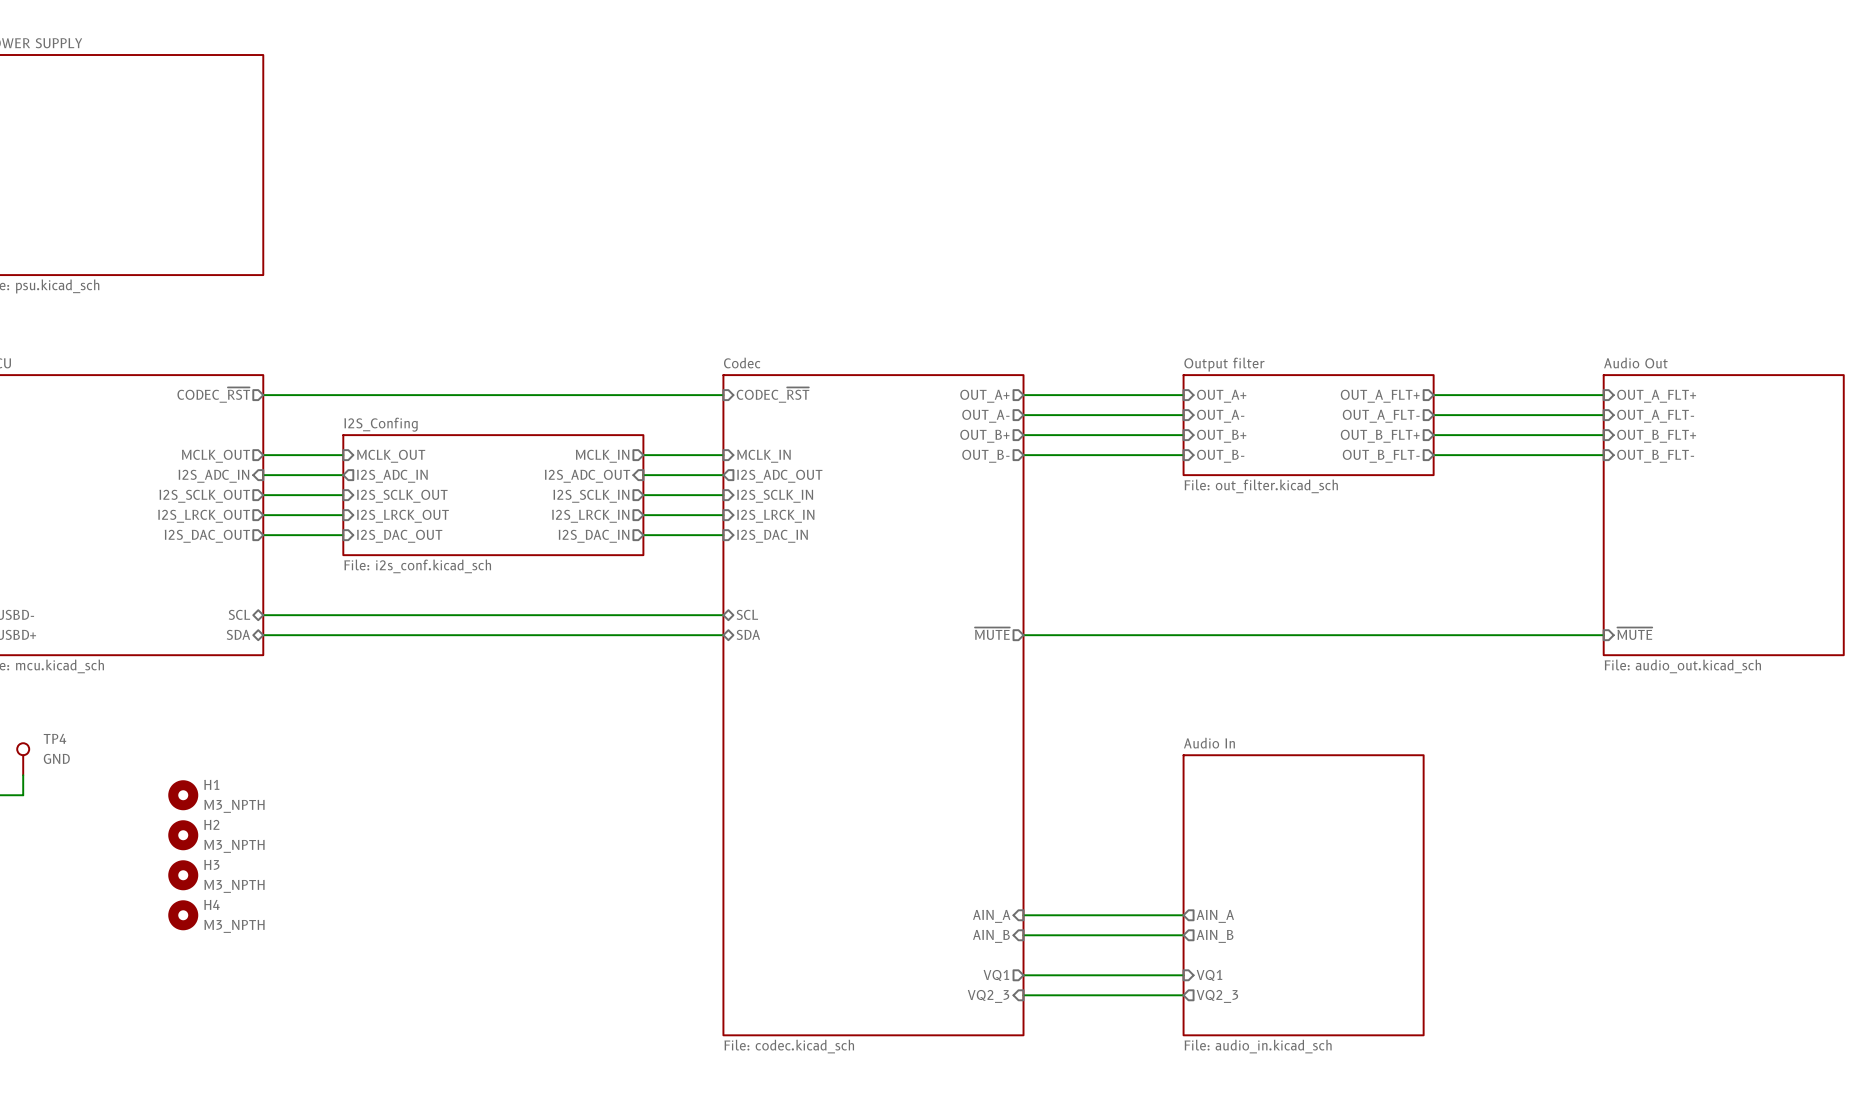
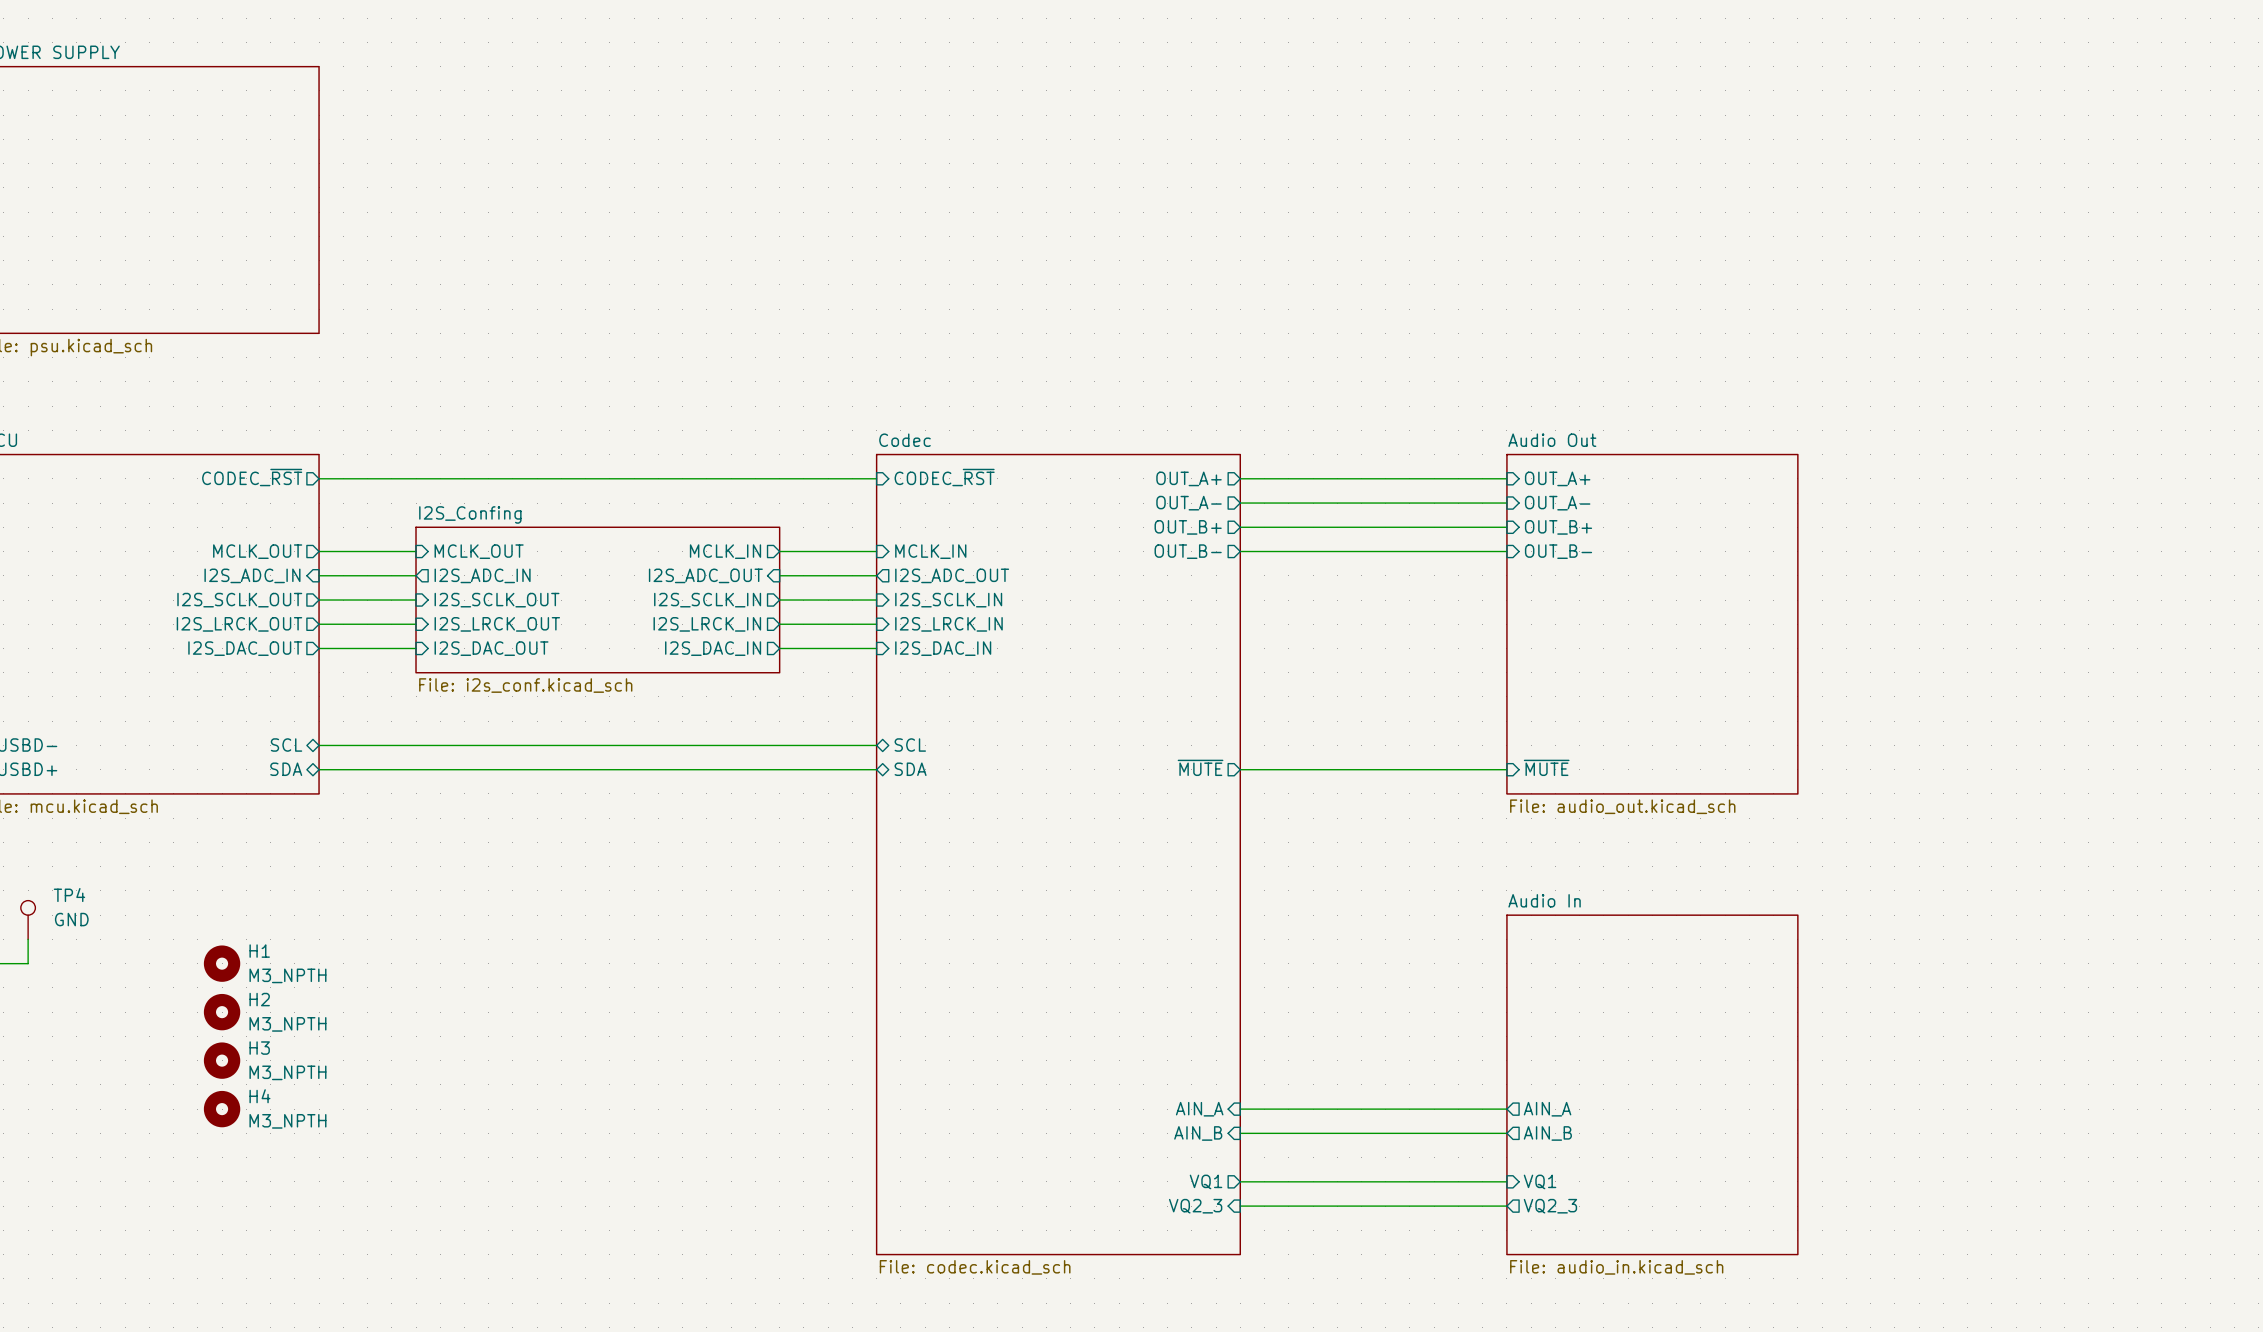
wire: none -> (1434, 478) (1506, 478)
wire: (1433, 395) (1603, 395) -> none
sheet pin position: OUT_A+ (1221, 396) -> OUT_A+ (1557, 478)
sheet pin: OUT_A_FLT+ (1380, 396) -> none
sheet pin: OUT_A_FLT+ (1656, 396) -> none
wire: none -> (1434, 503) (1506, 503)
wire: (1433, 415) (1603, 415) -> none
sheet pin position: OUT_A- (1220, 416) -> OUT_A- (1557, 503)
sheet pin: OUT_A_FLT- (1381, 416) -> none
sheet pin: OUT_A_FLT- (1655, 416) -> none
sheet Output filter: File: out_filter.kicad_sch (1308, 425) -> none
wire: none -> (1434, 527) (1506, 527)
wire: (1433, 435) (1603, 435) -> none
sheet pin position: OUT_B+ (1221, 436) -> OUT_B+ (1558, 527)
sheet pin: OUT_B_FLT+ (1380, 436) -> none
sheet pin: OUT_B_FLT+ (1656, 436) -> none
wire: none -> (1434, 551) (1506, 551)
wire: (1433, 455) (1603, 455) -> none
sheet pin position: OUT_B- (1220, 456) -> OUT_B- (1558, 551)
sheet pin: OUT_B_FLT- (1381, 456) -> none
sheet pin: OUT_B_FLT- (1655, 456) -> none
sheet Audio Out: none -> File: audio_out.kicad_sch (1652, 624)
sheet Audio Out: File: audio_out.kicad_sch (1723, 515) -> none
sheet pin: none -> ~{MUTE} (1546, 767)
sheet pin: ~{MUTE} (1634, 633) -> none
wire: (1243, 635) (1603, 635) -> none
sheet Audio In position: (1303, 895) -> (1652, 1084)
wire: none -> (1434, 1109) (1506, 1109)
sheet pin position: AIN_A (1215, 916) -> AIN_A (1547, 1109)
wire: none -> (1434, 1133) (1506, 1133)
sheet pin position: AIN_B (1215, 936) -> AIN_B (1547, 1133)
wire: none -> (1434, 1181) (1506, 1181)
sheet pin position: VQ1 (1209, 975) -> VQ1 (1540, 1181)
wire: none -> (1434, 1206) (1506, 1206)
sheet pin position: VQ2_3 (1217, 996) -> VQ2_3 (1550, 1206)

